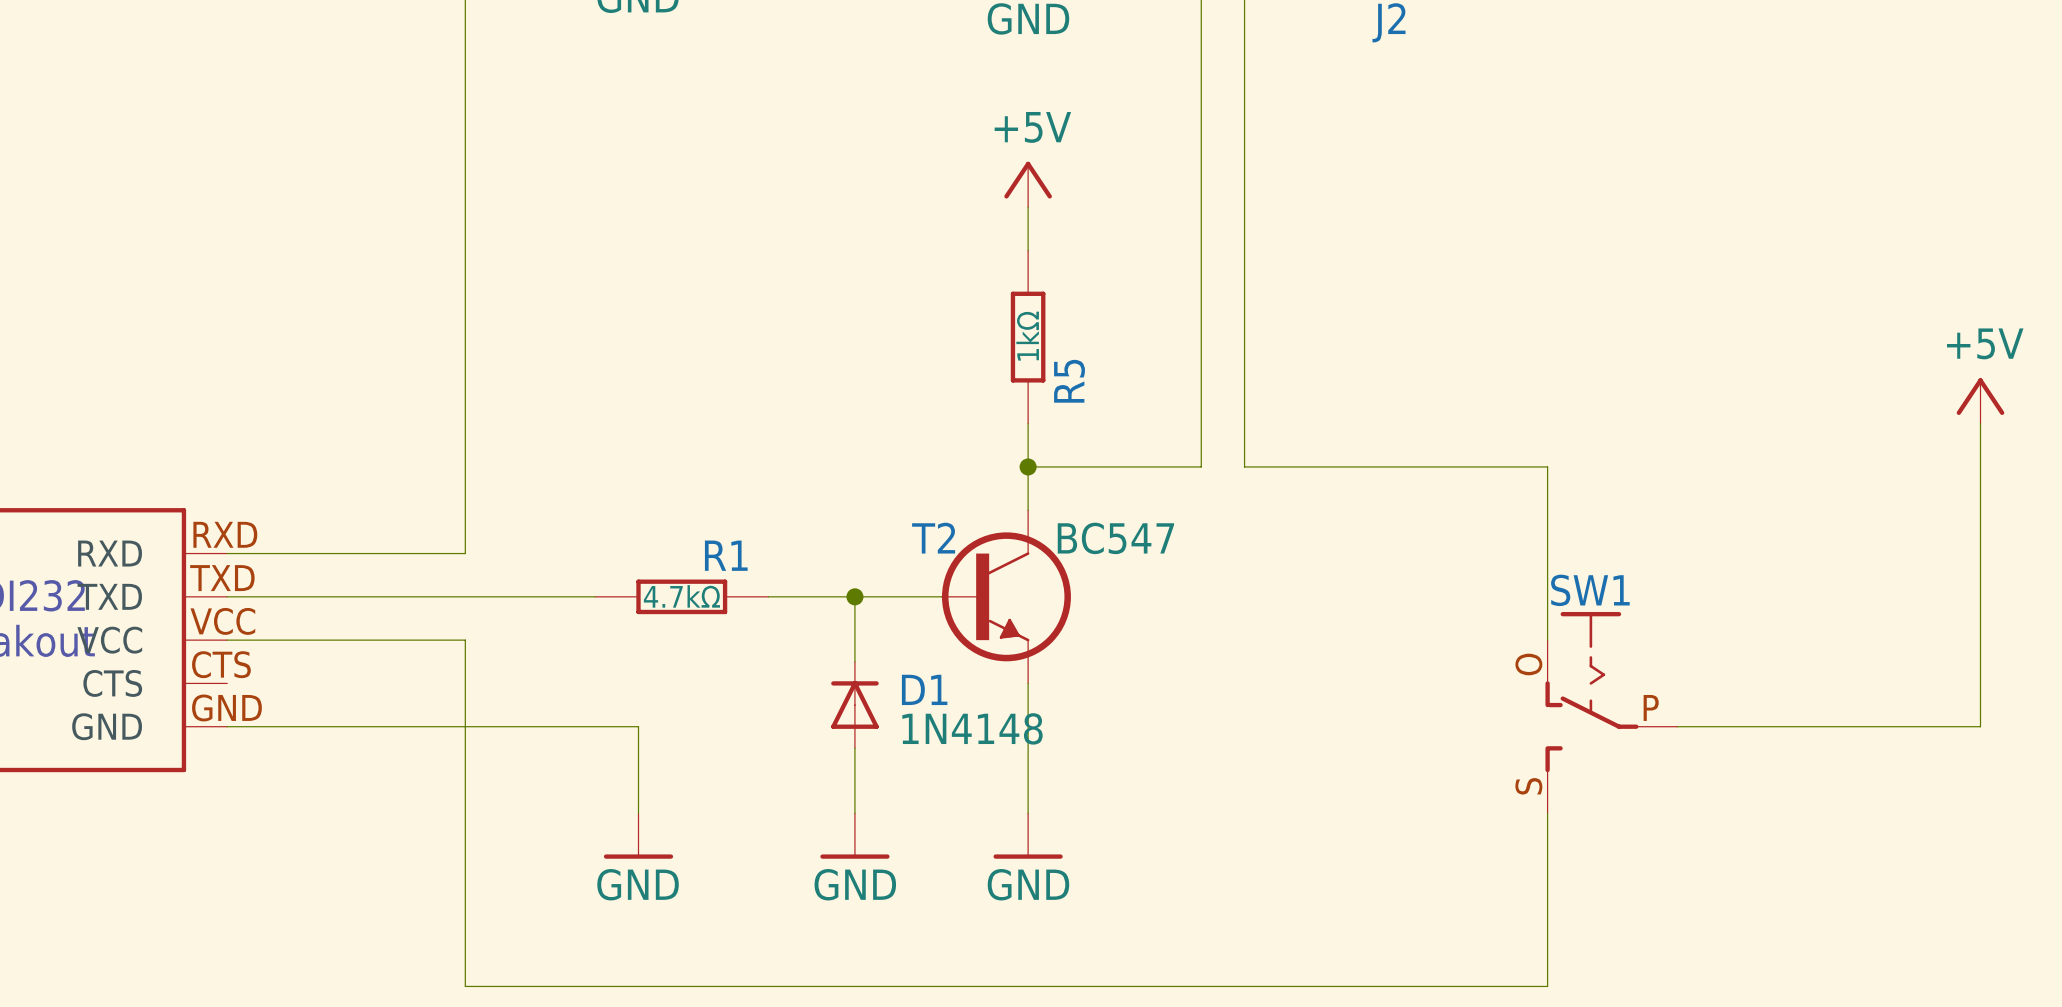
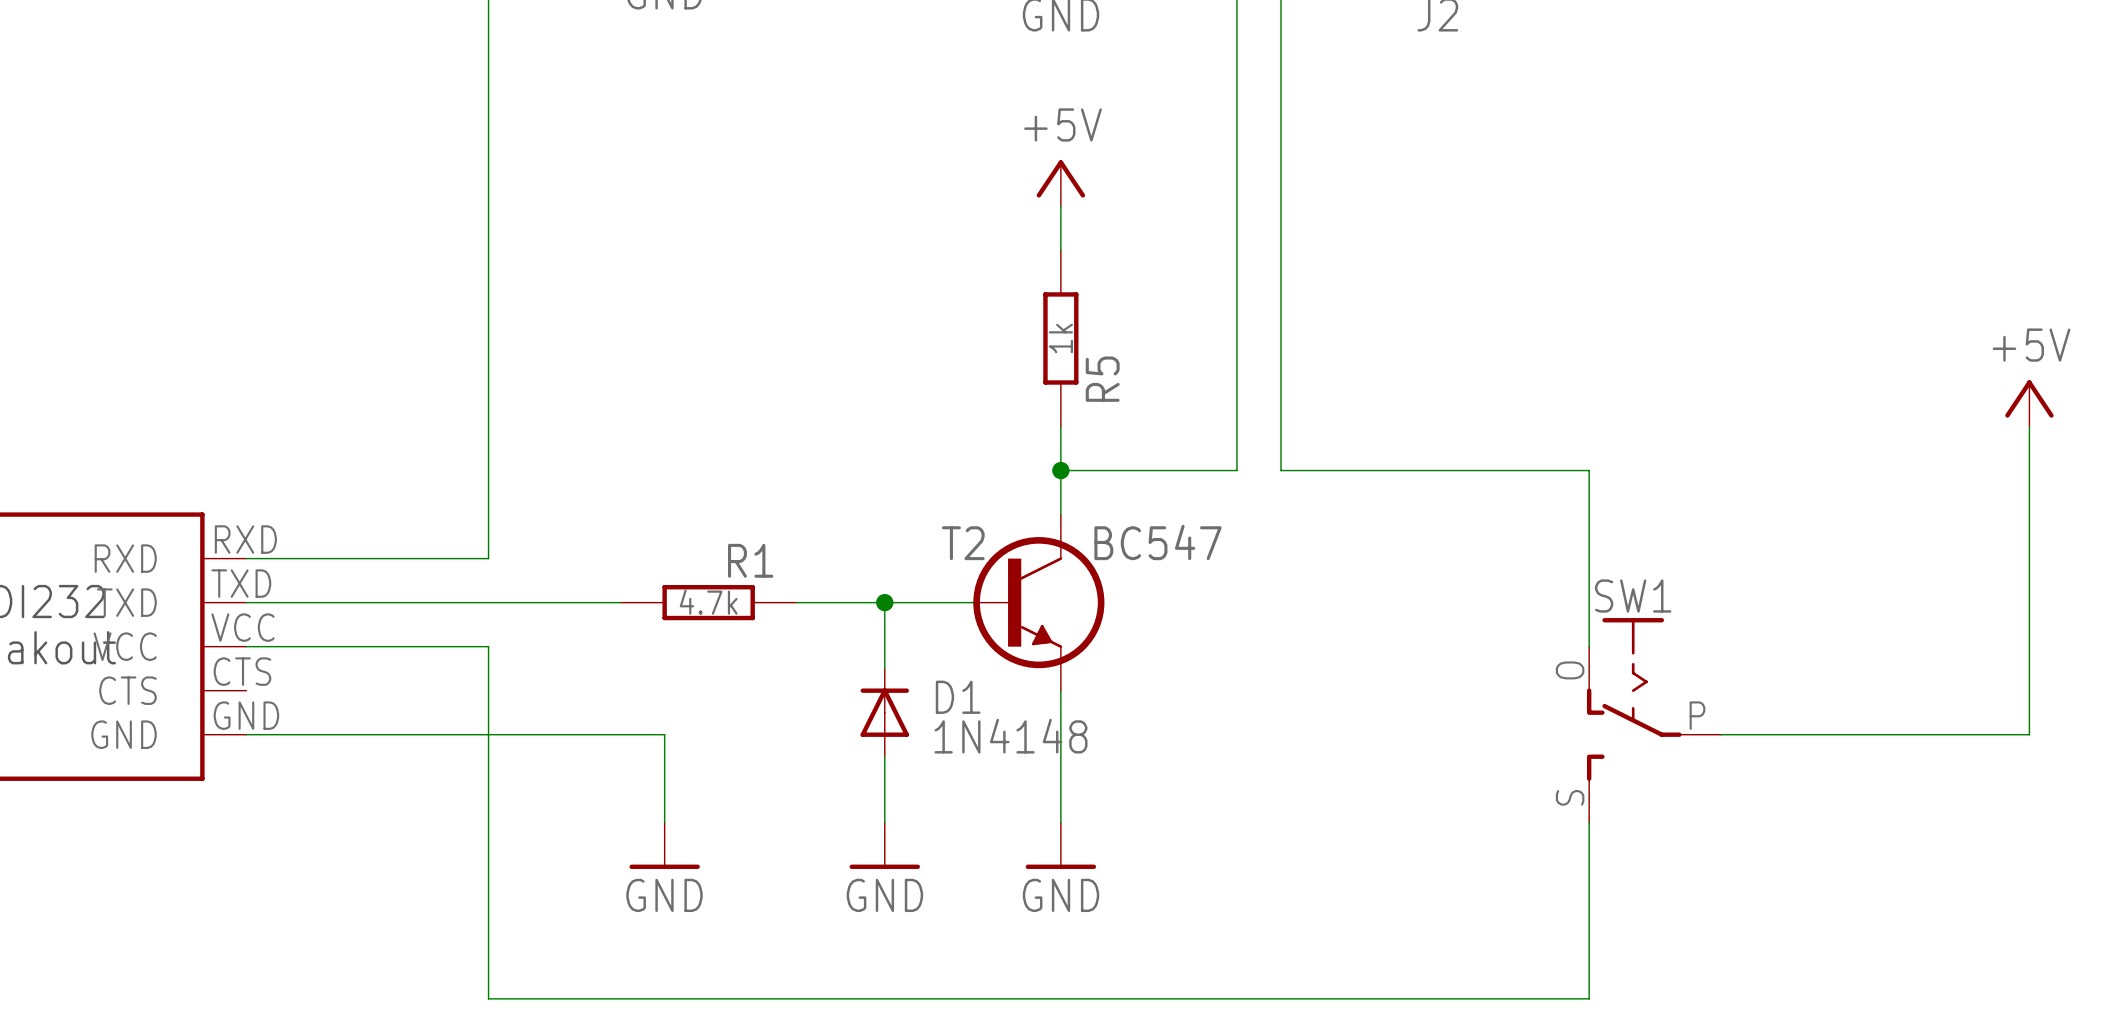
R5 value: 1kΩ (1027, 336) -> 1k (1060, 338)
R1 value: 4.7kΩ (681, 596) -> 4.7k (708, 602)

